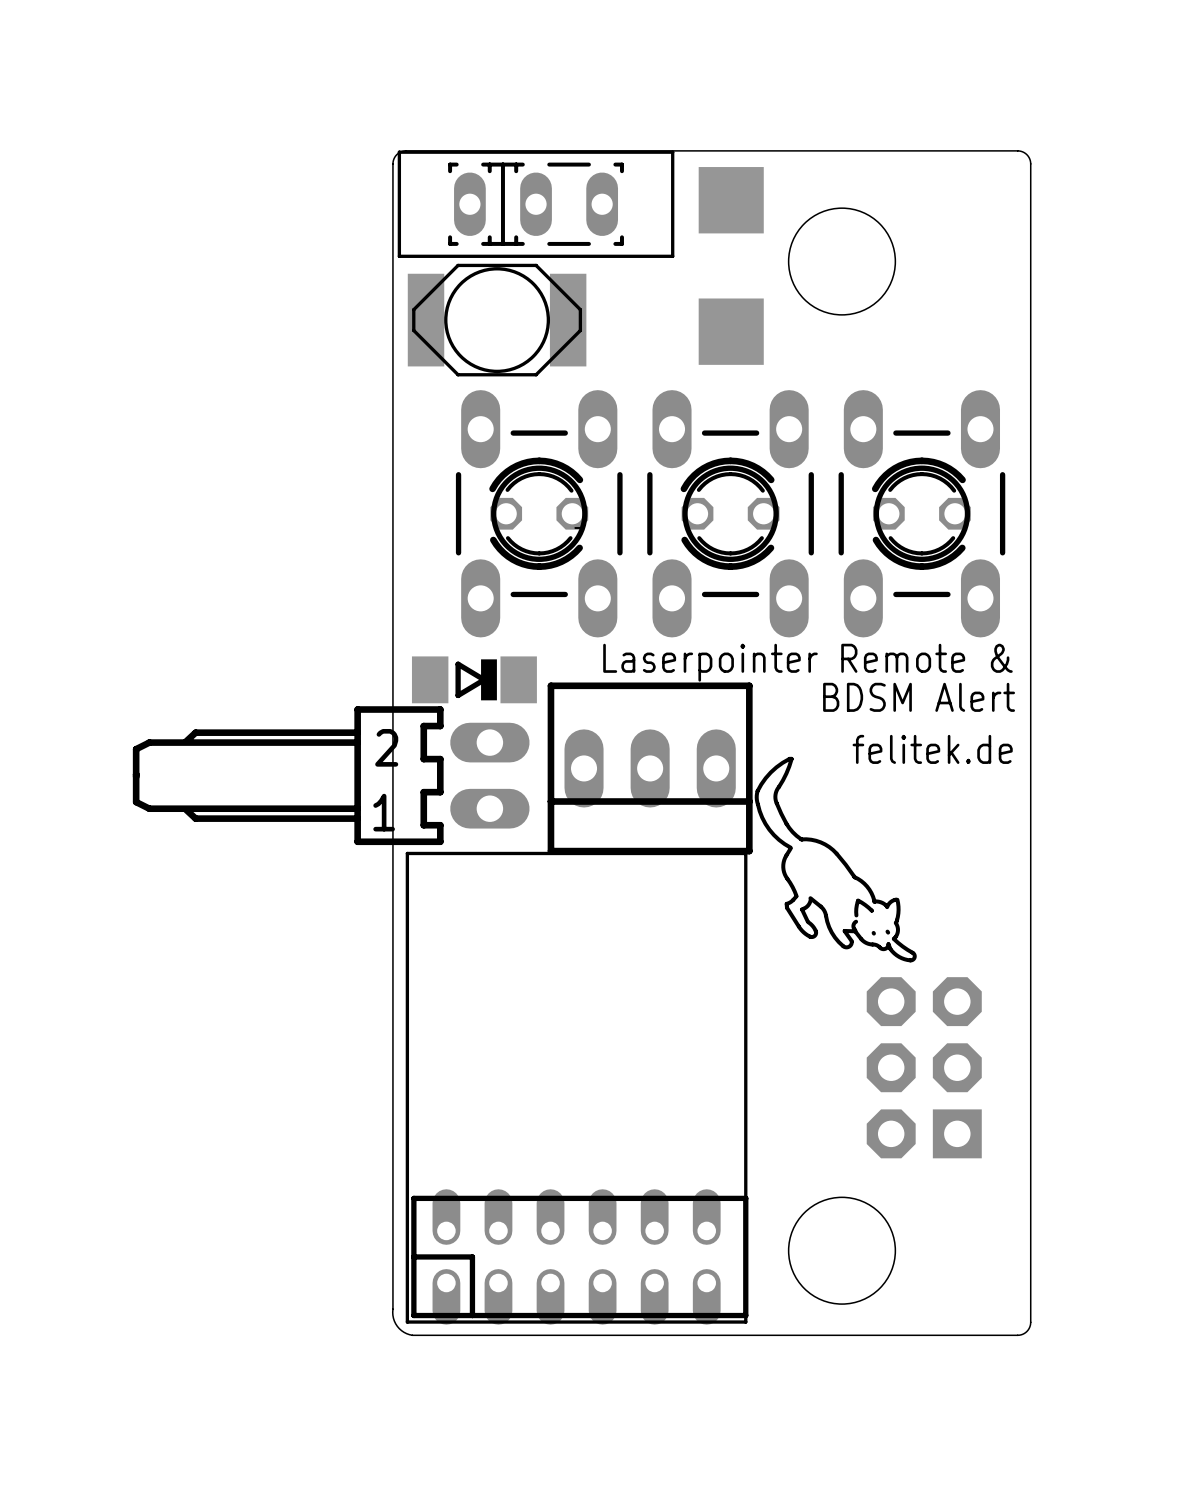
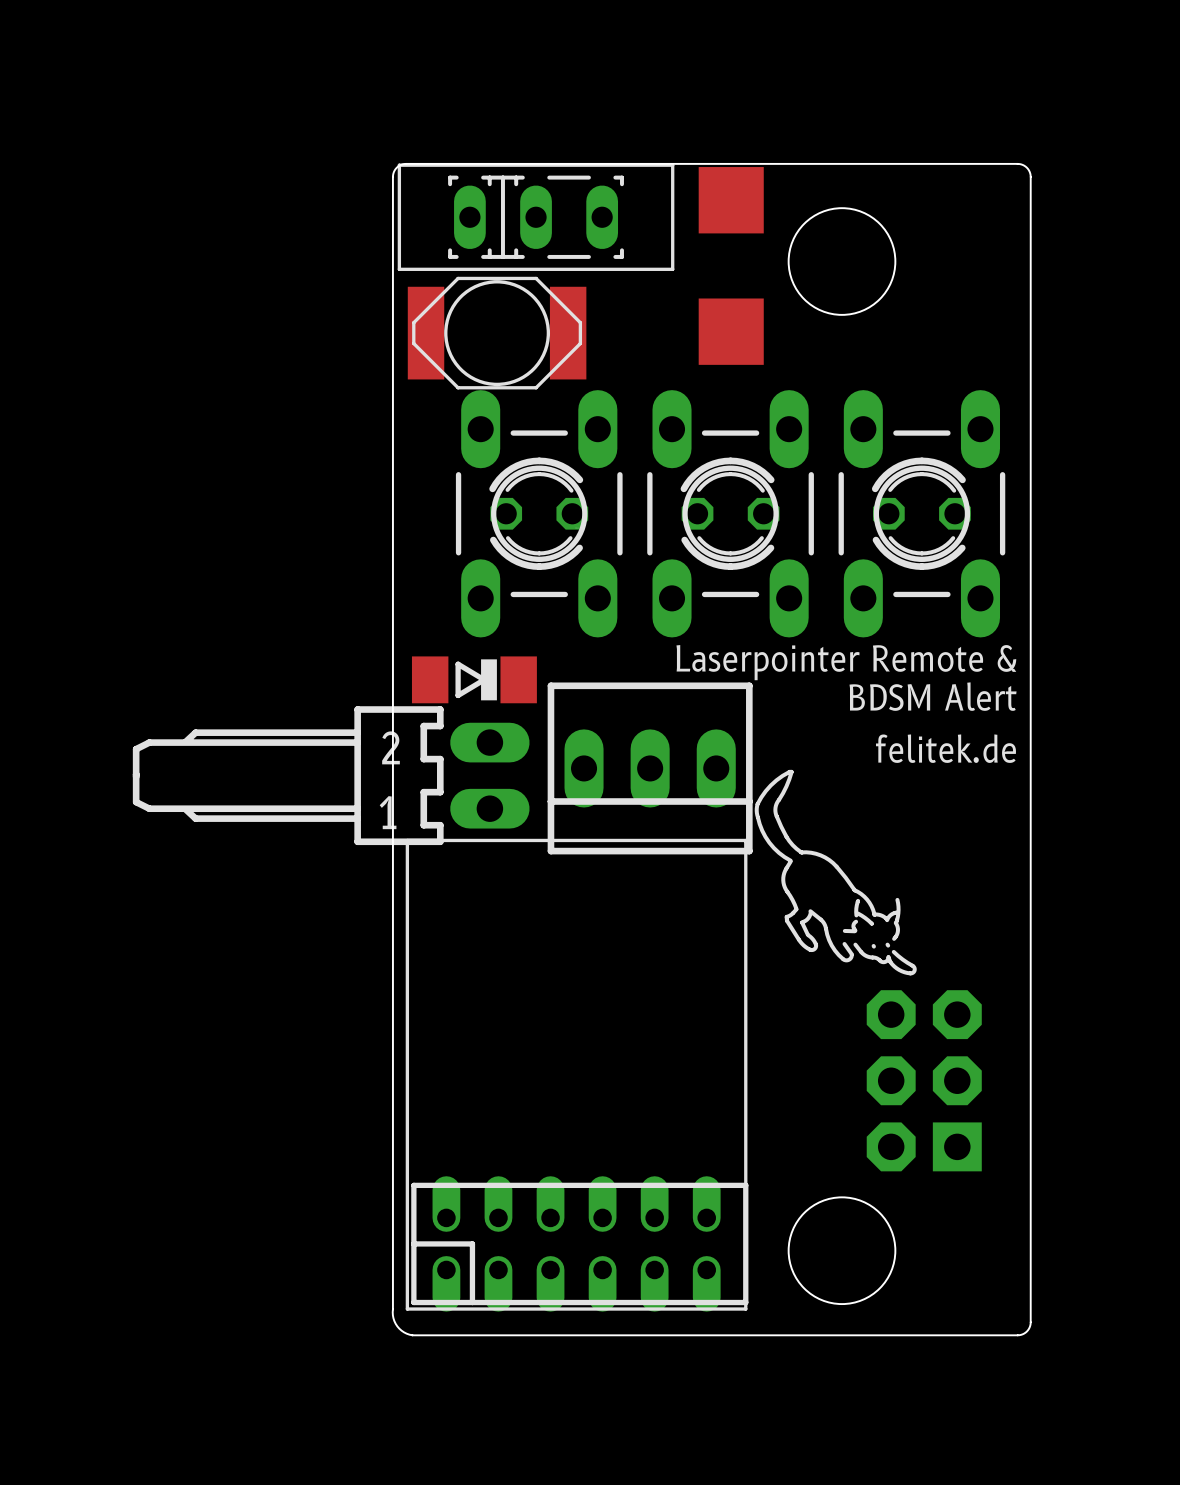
board edge: (392, 176) (394, 157) (399, 152) (405, 150) (1017, 150) (1024, 152) (1028, 157) (1030, 176) -> (392, 176) (396, 167) (405, 163) (1017, 163) (1026, 167) (1030, 176)
part position: (536, 204) -> (536, 217)
part position: (497, 320) -> (497, 333)
line: (789, 758) (776, 767) (765, 778) (757, 791) (756, 797) (762, 817) (769, 829) (779, 839) (790, 847) -> (789, 771) (776, 780) (765, 791) (757, 804) (756, 810) (762, 830) (769, 842) (779, 852) (790, 860)
line: (791, 759) (786, 773) (776, 791) (775, 798) (786, 823) (801, 839) -> (791, 772) (786, 786) (776, 804) (775, 811) (786, 836) (801, 852)
line: (801, 839) (816, 840) (829, 847) (854, 877) -> (801, 852) (816, 853) (829, 860) (854, 890)
line: (790, 848) (784, 860) (783, 869) (796, 896) -> (790, 861) (784, 873) (783, 882) (796, 909)
line: (854, 877) (867, 886) (874, 901) -> (854, 890) (867, 899) (874, 914)
line: (796, 896) (786, 903) -> (796, 909) (786, 916)
line: (810, 898) (824, 910) (829, 927) (838, 942) (846, 947) (851, 941) -> (810, 911) (824, 923) (829, 940) (838, 955) (846, 960) (851, 954)
line: (810, 899) (807, 905) (801, 909) -> (810, 912) (807, 919) (801, 922)
line: (896, 899) (890, 902) (887, 907) -> (896, 912) (890, 915) (887, 920)
line: (858, 900) (871, 910) -> (858, 913) (871, 923)
line: (874, 901) (886, 905) -> (874, 914) (886, 918)
line: (786, 904) (800, 928) (807, 935) (812, 936) (815, 931) (808, 922) -> (786, 917) (800, 941) (807, 948) (812, 949) (815, 944) (808, 935)
line: (802, 909) (807, 921) -> (802, 922) (807, 934)
line: (844, 930) (851, 941) -> (844, 943) (851, 954)
line: (855, 931) (866, 943) (883, 949) (887, 947) (888, 944) (892, 951) (899, 956) (907, 959) (913, 959) (913, 953) (893, 938) -> (855, 944) (866, 956) (883, 962) (887, 960) (888, 957) (892, 964) (899, 969) (907, 972) (913, 972) (913, 966) (893, 951)
line: (887, 931) (888, 932) -> (887, 944) (888, 945)
line: (873, 932) (873, 933) -> (873, 945) (873, 946)
part position: (924, 1067) -> (924, 1080)
part position: (577, 1088) -> (577, 1075)

